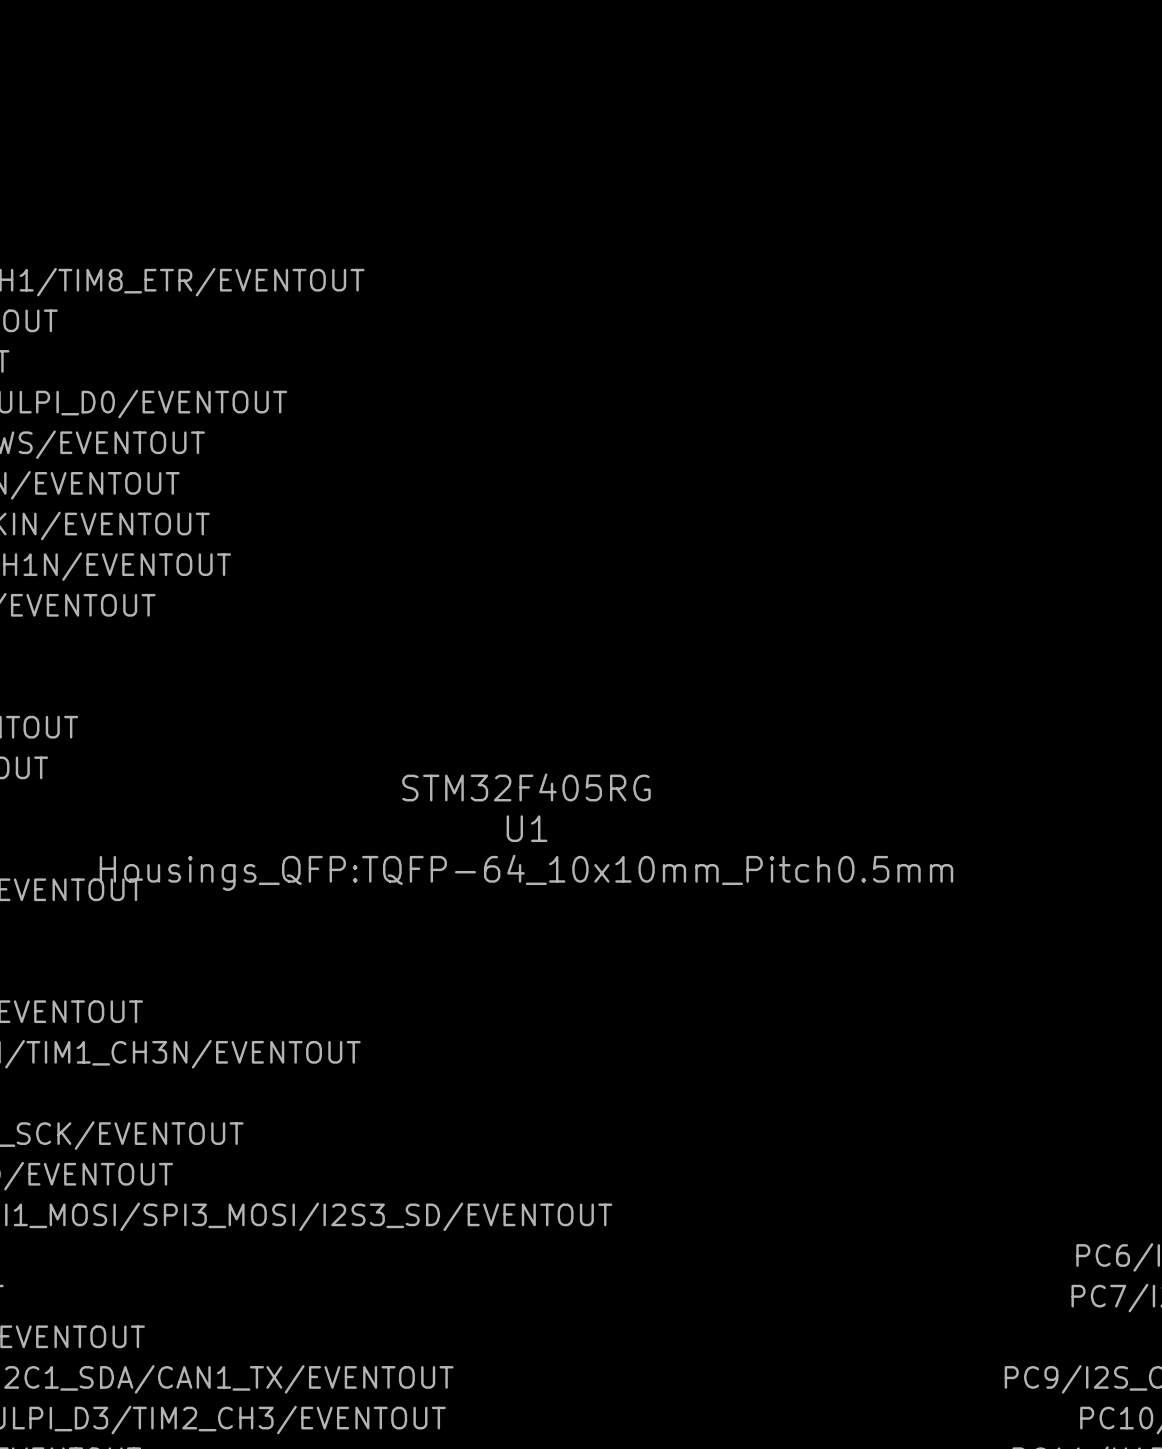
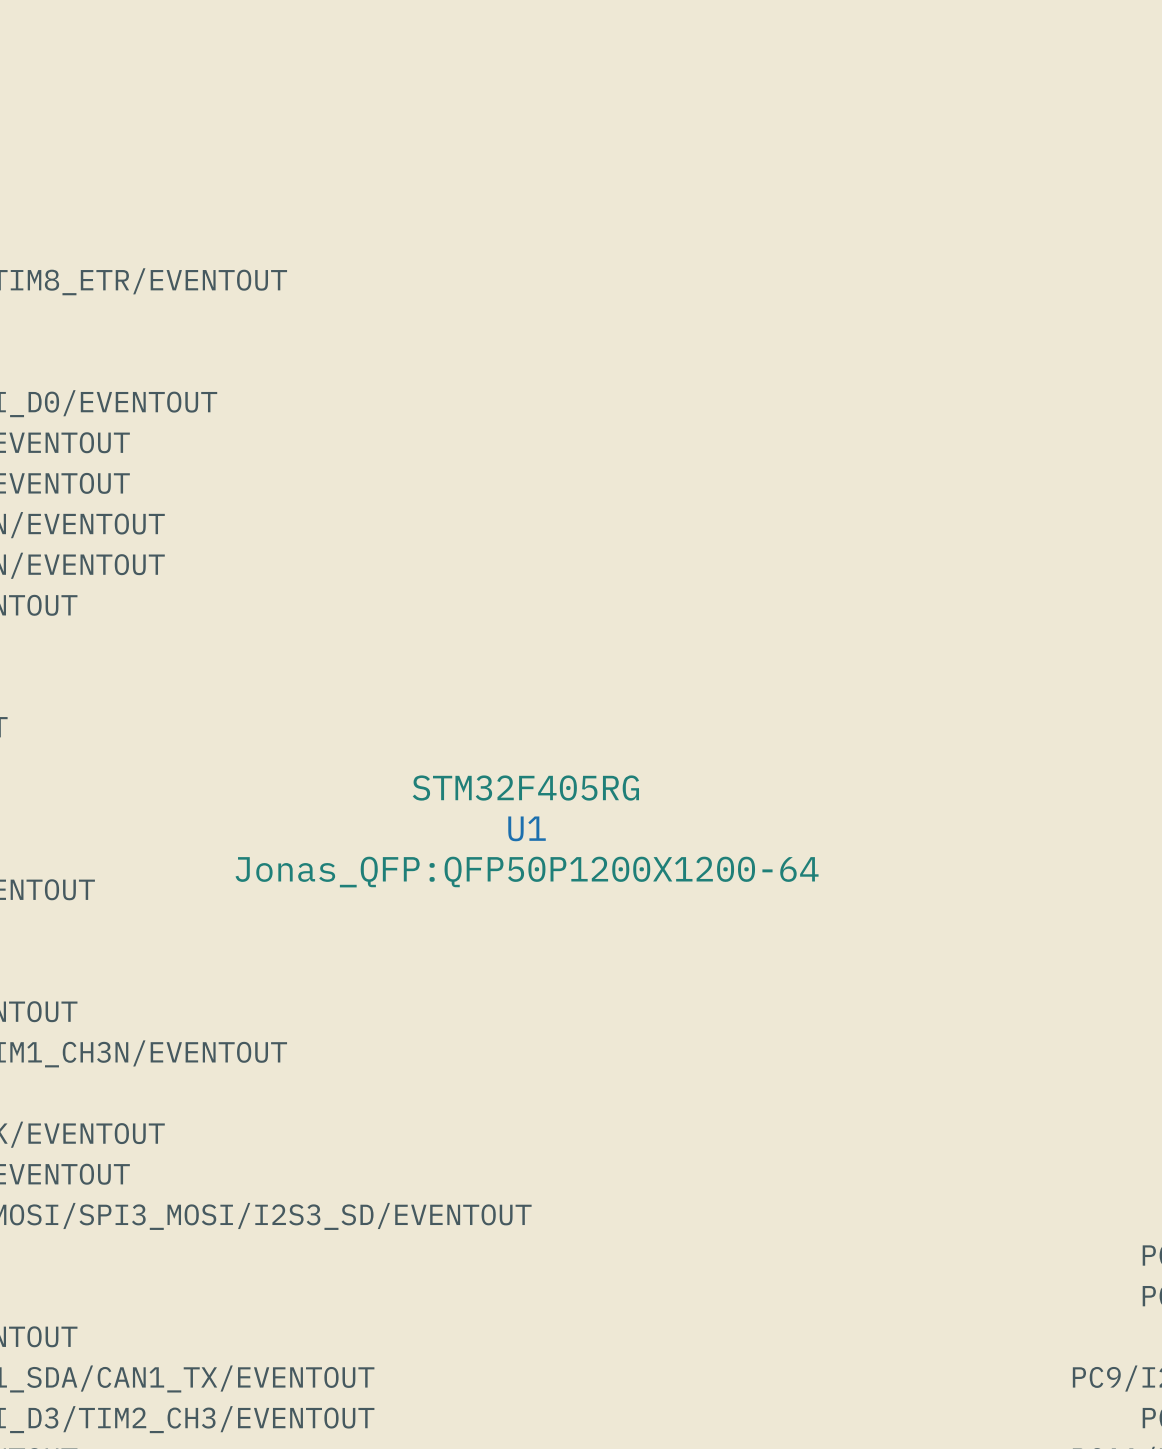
U1 text: Housings_QFP:TQFP-64_10x10mm_Pitch0.5mm (526, 872) -> Jonas_QFP:QFP50P1200X1200-64 (527, 872)

